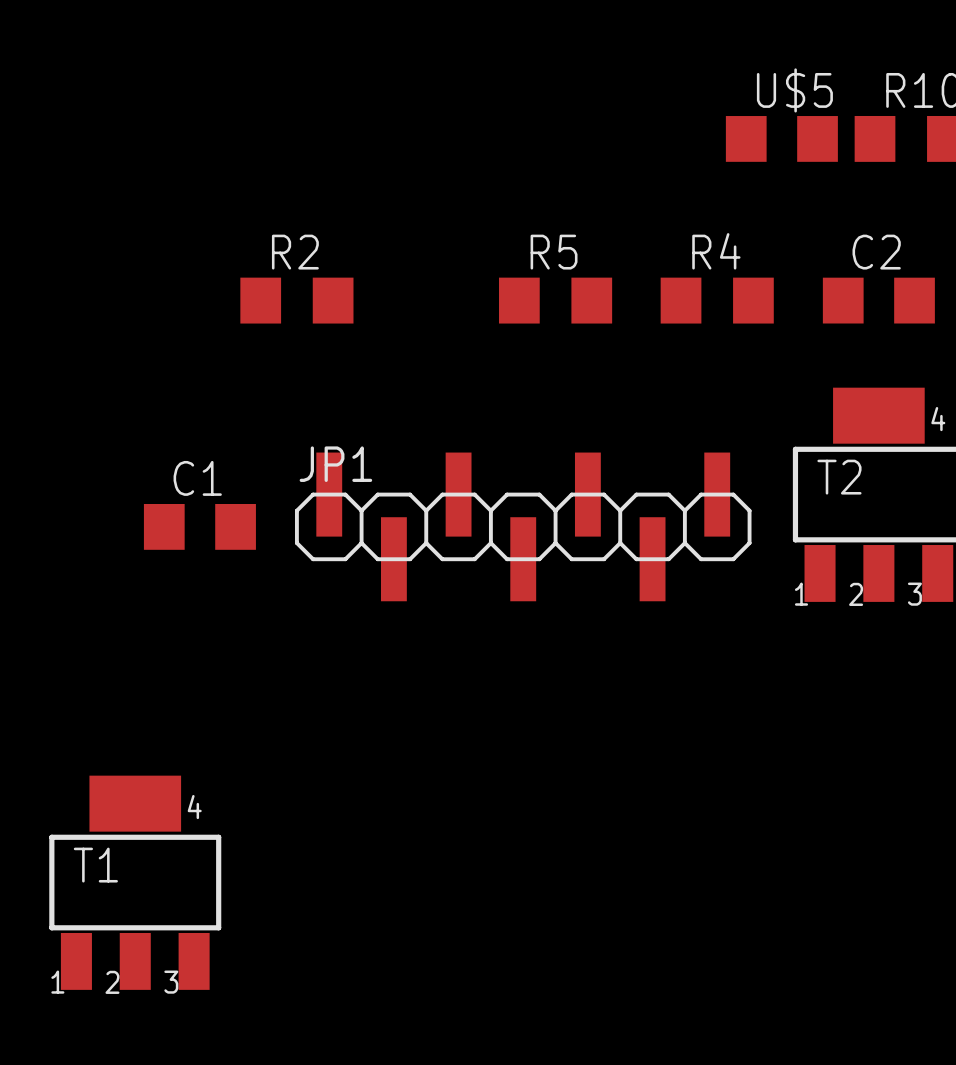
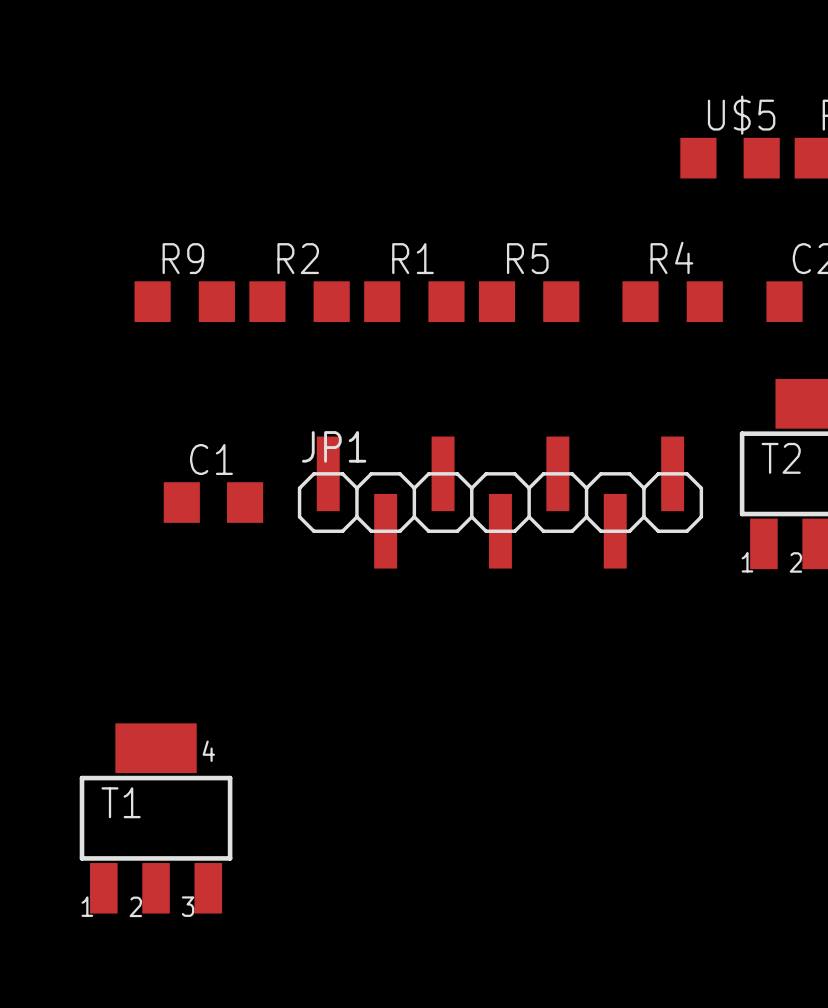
R9: none -> (184, 301)
R1: none -> (414, 301)

